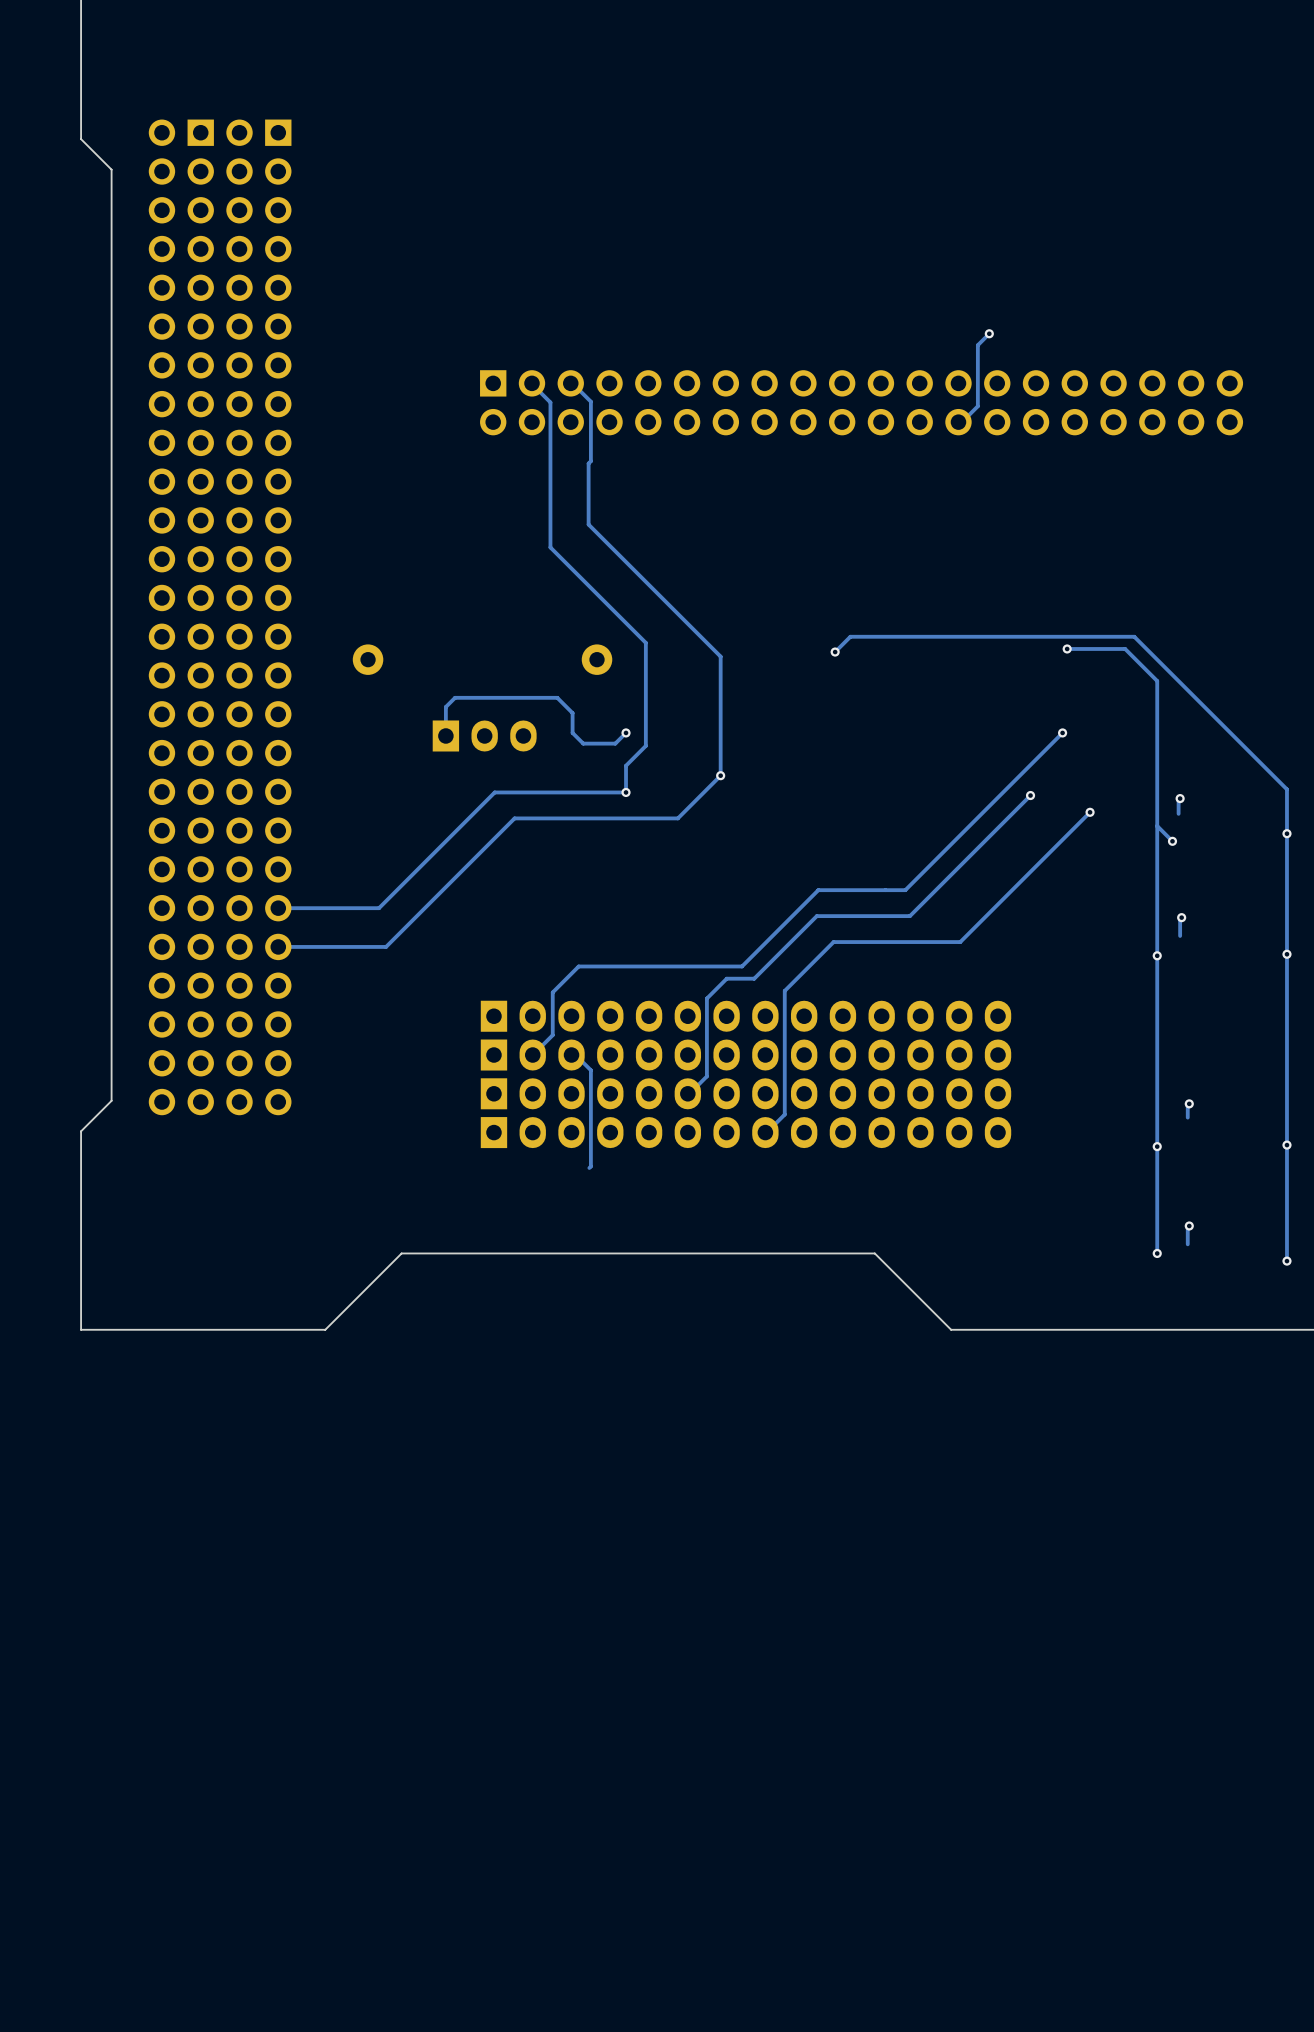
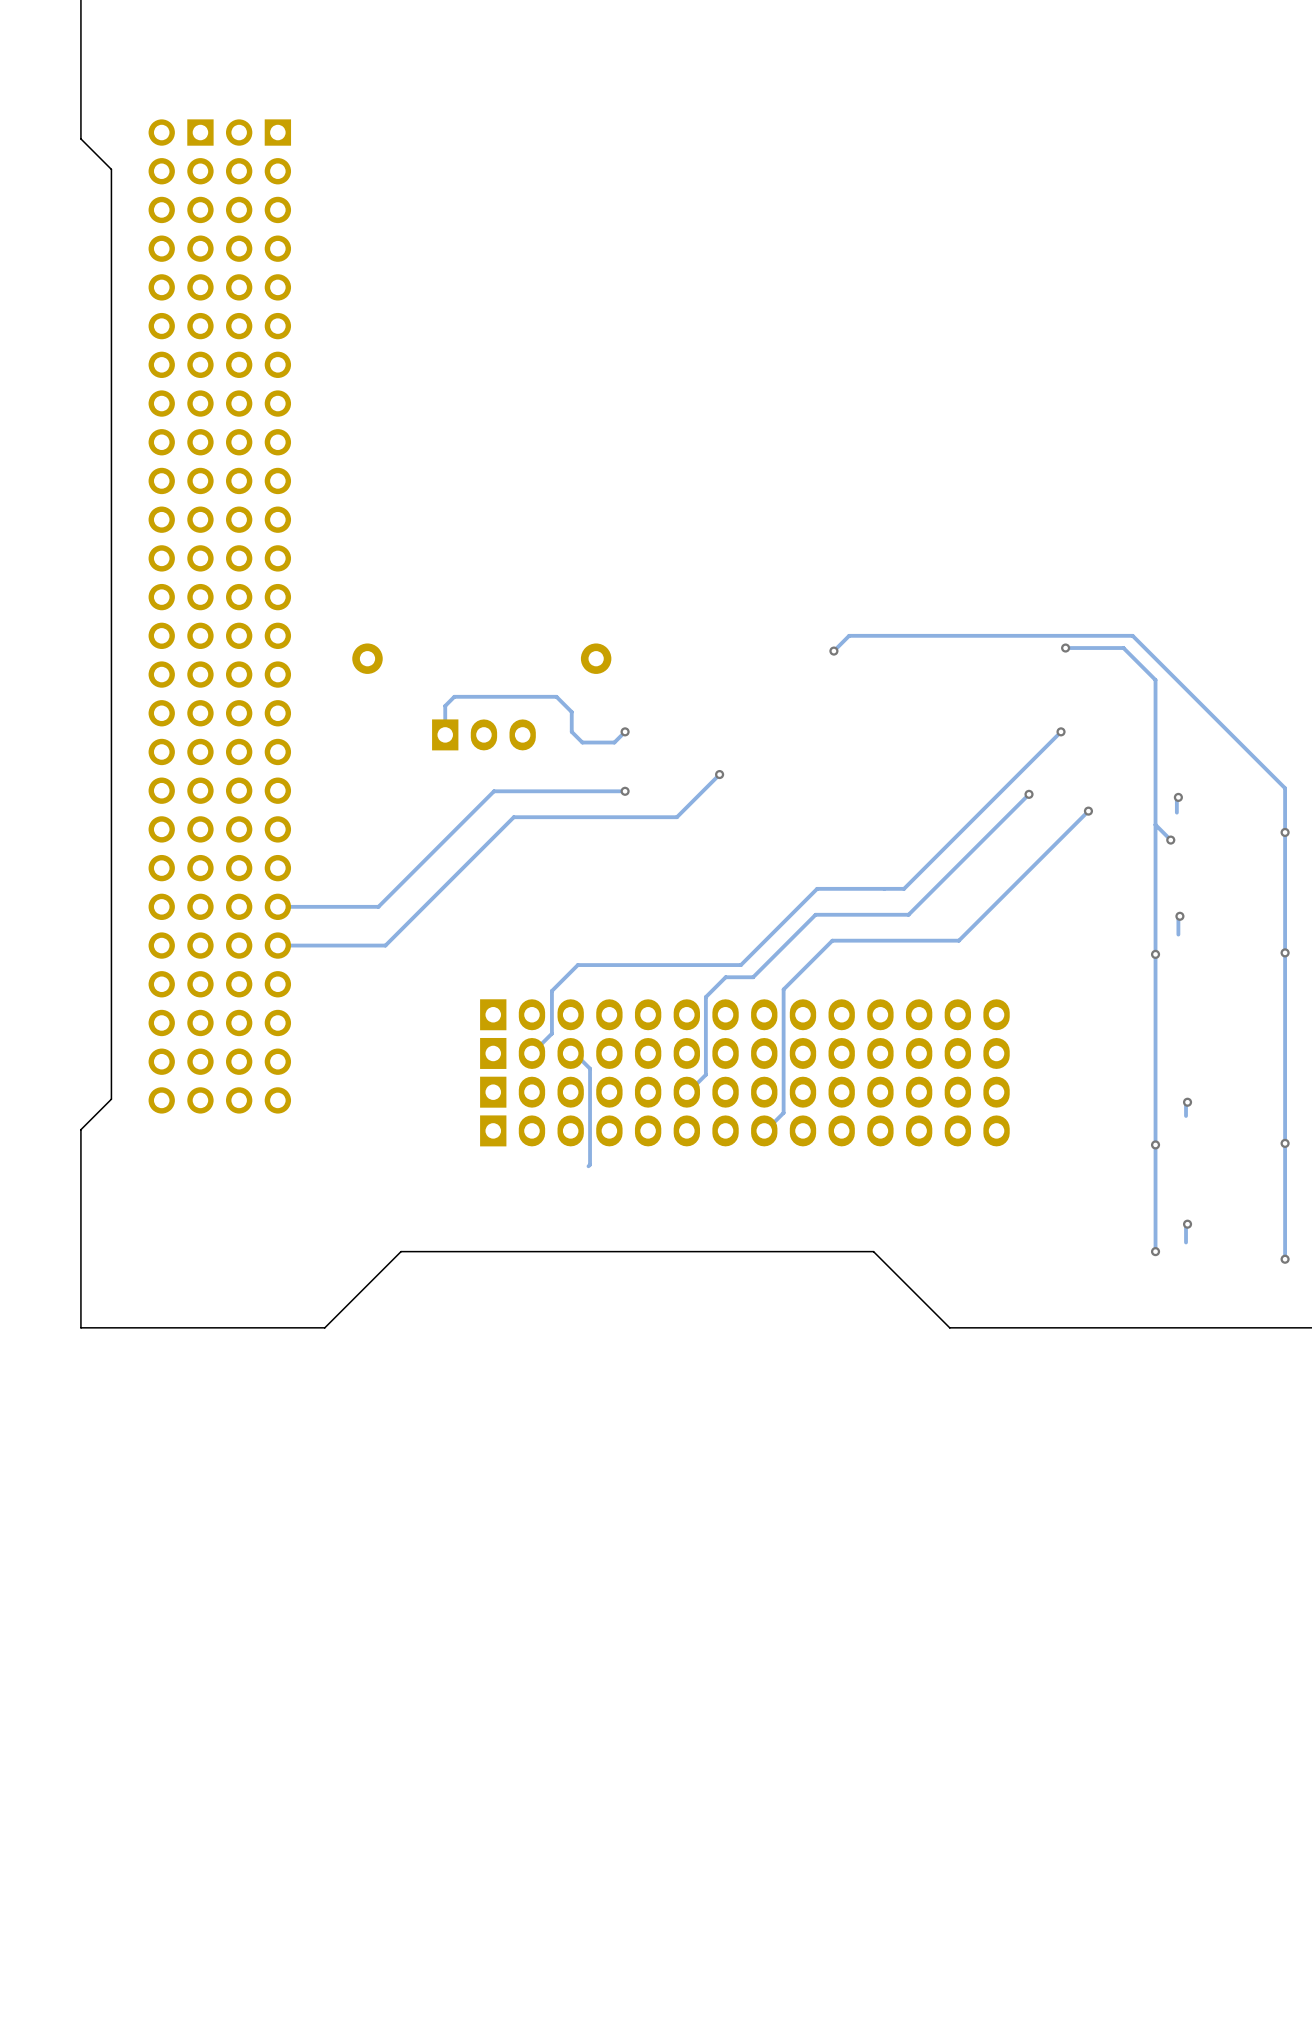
track: (989, 333) (977, 345) (977, 406) (961, 422) (958, 422) -> none
via: (989, 333) -> none
track: (531, 383) (550, 402) (550, 547) (645, 642) (645, 745) (626, 765) (626, 792) -> none
track: (570, 383) (590, 401) (588, 524) (720, 656) (720, 775) -> none
part: (861, 402) -> none

